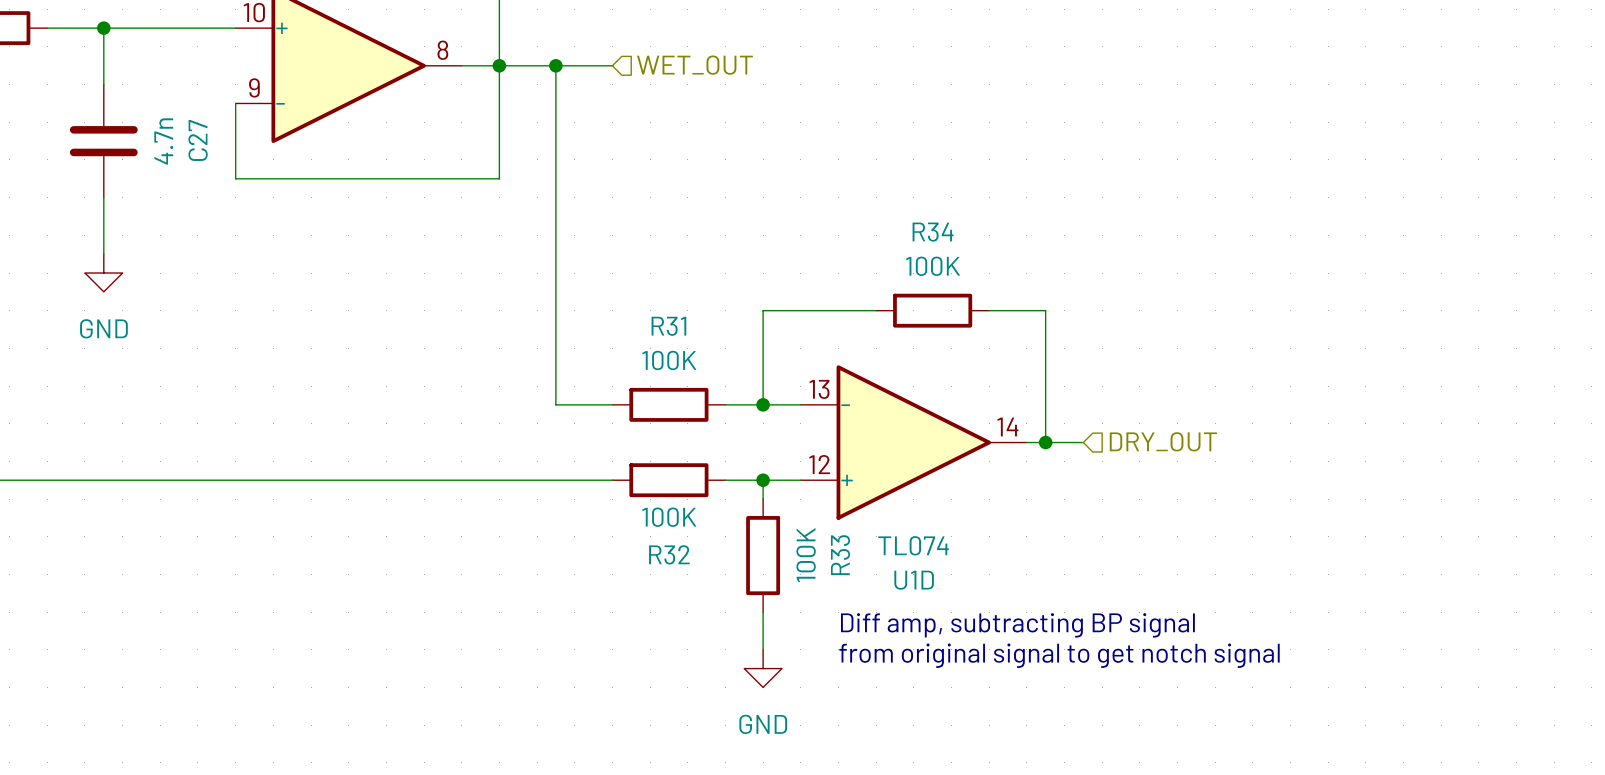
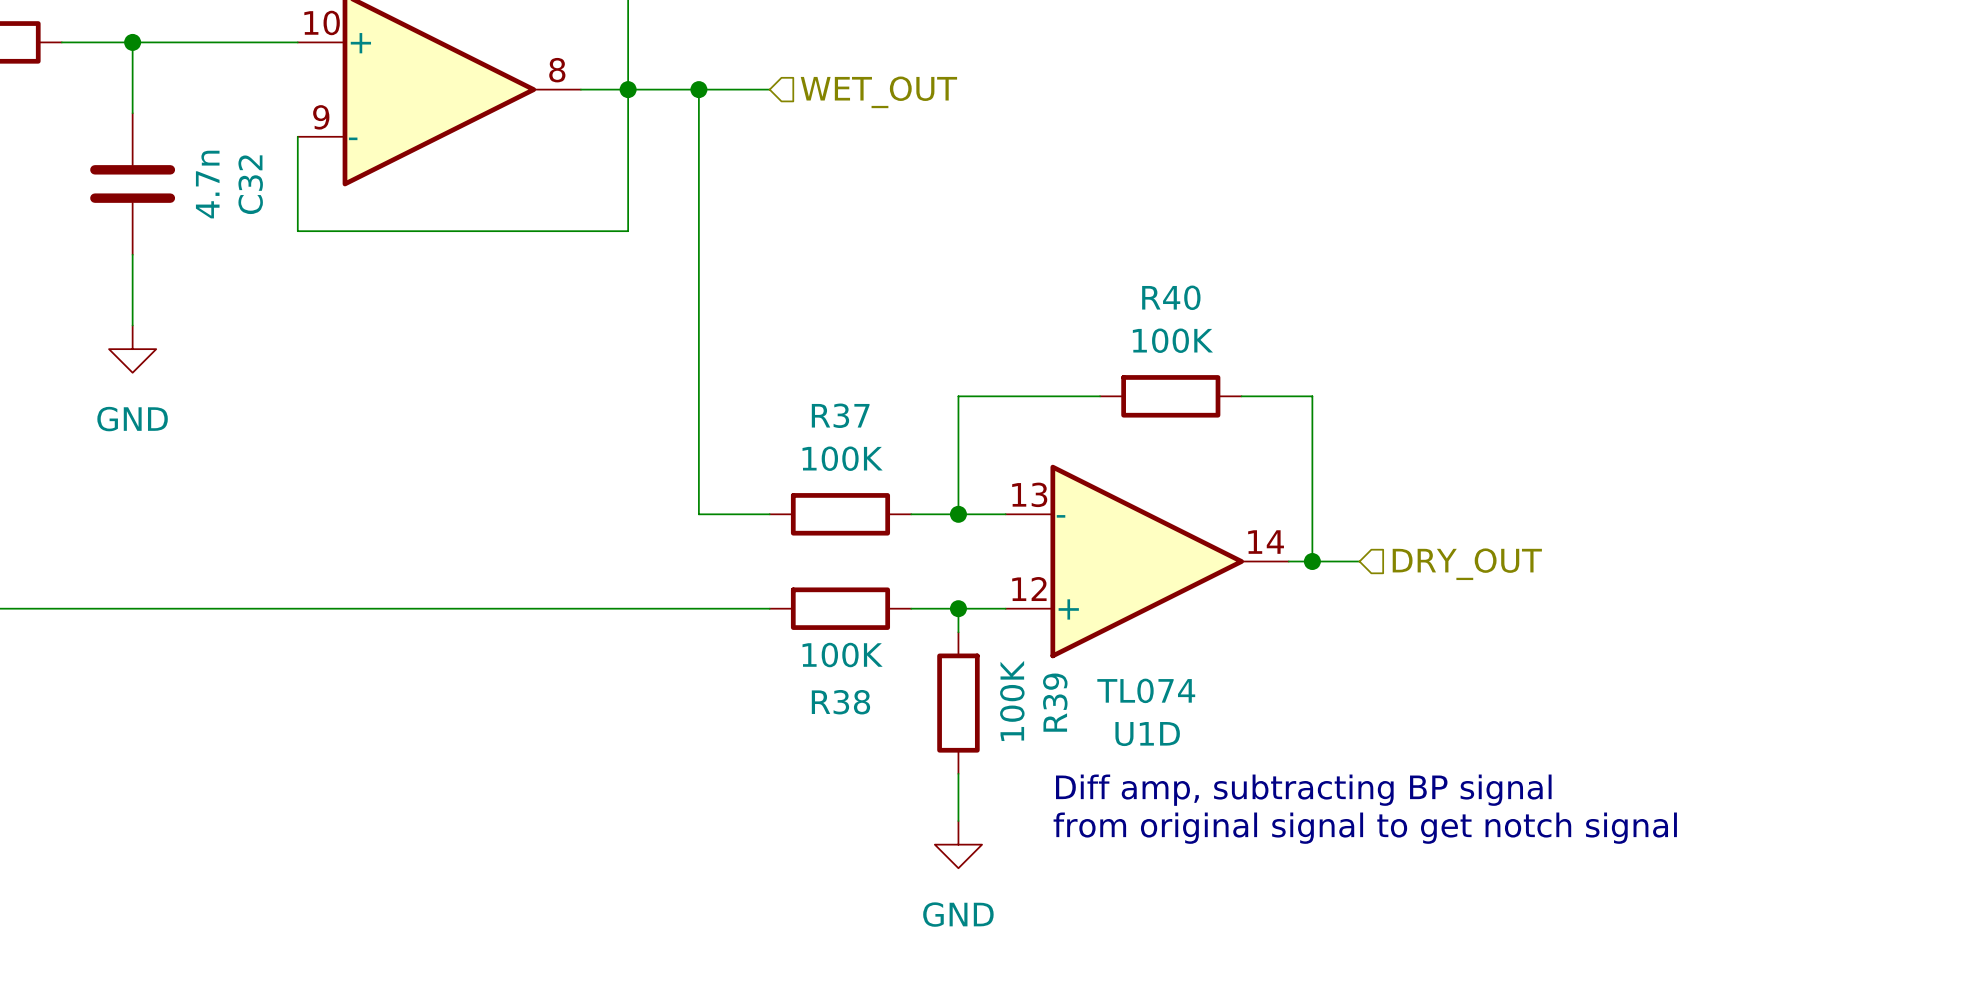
C27 name: C27 (198, 140) -> C32 (250, 184)
R34 name: R34 (933, 232) -> R40 (1171, 297)
R31 name: R31 (668, 326) -> R37 (840, 415)
R32 name: R32 (669, 554) -> R38 (840, 702)
R33 name: R33 (840, 555) -> R39 (1055, 702)

